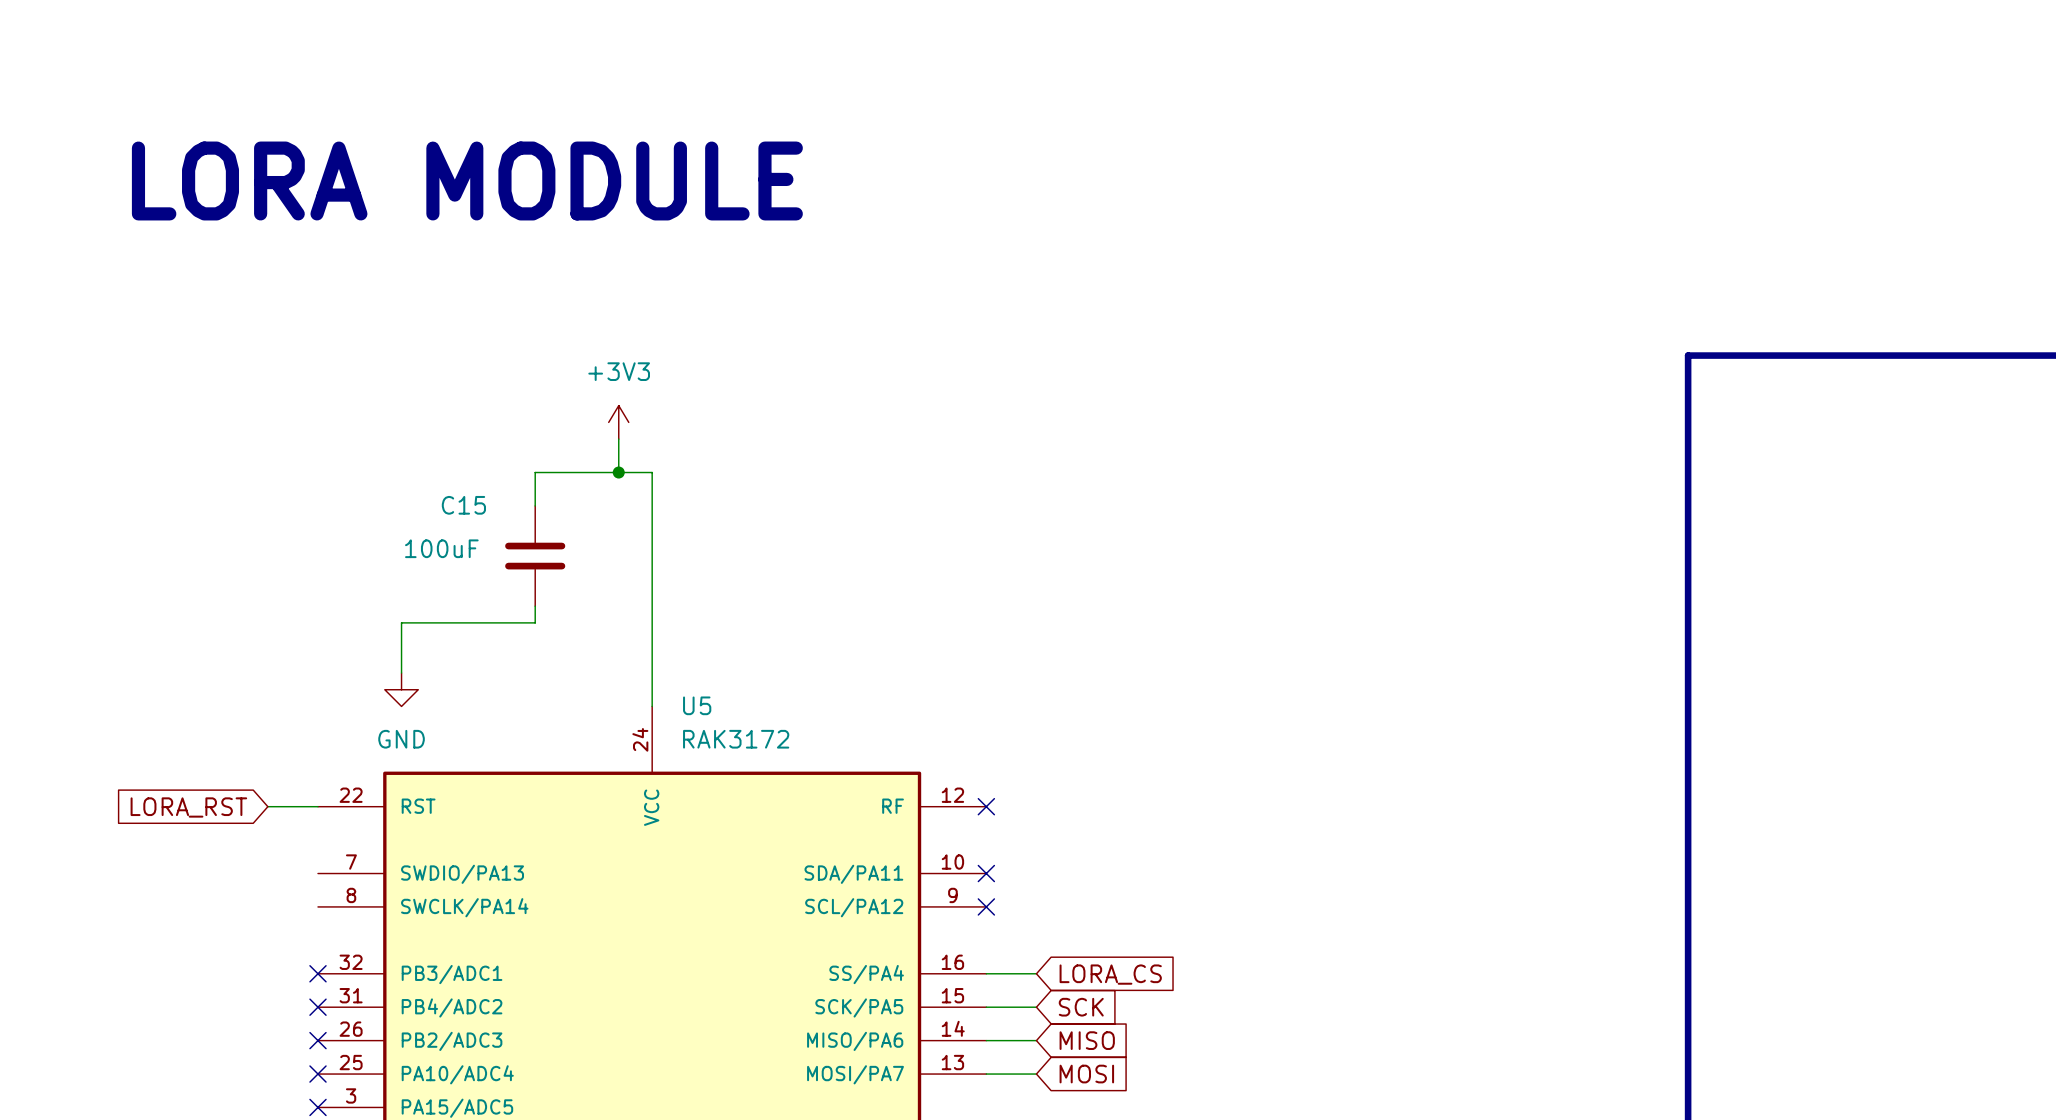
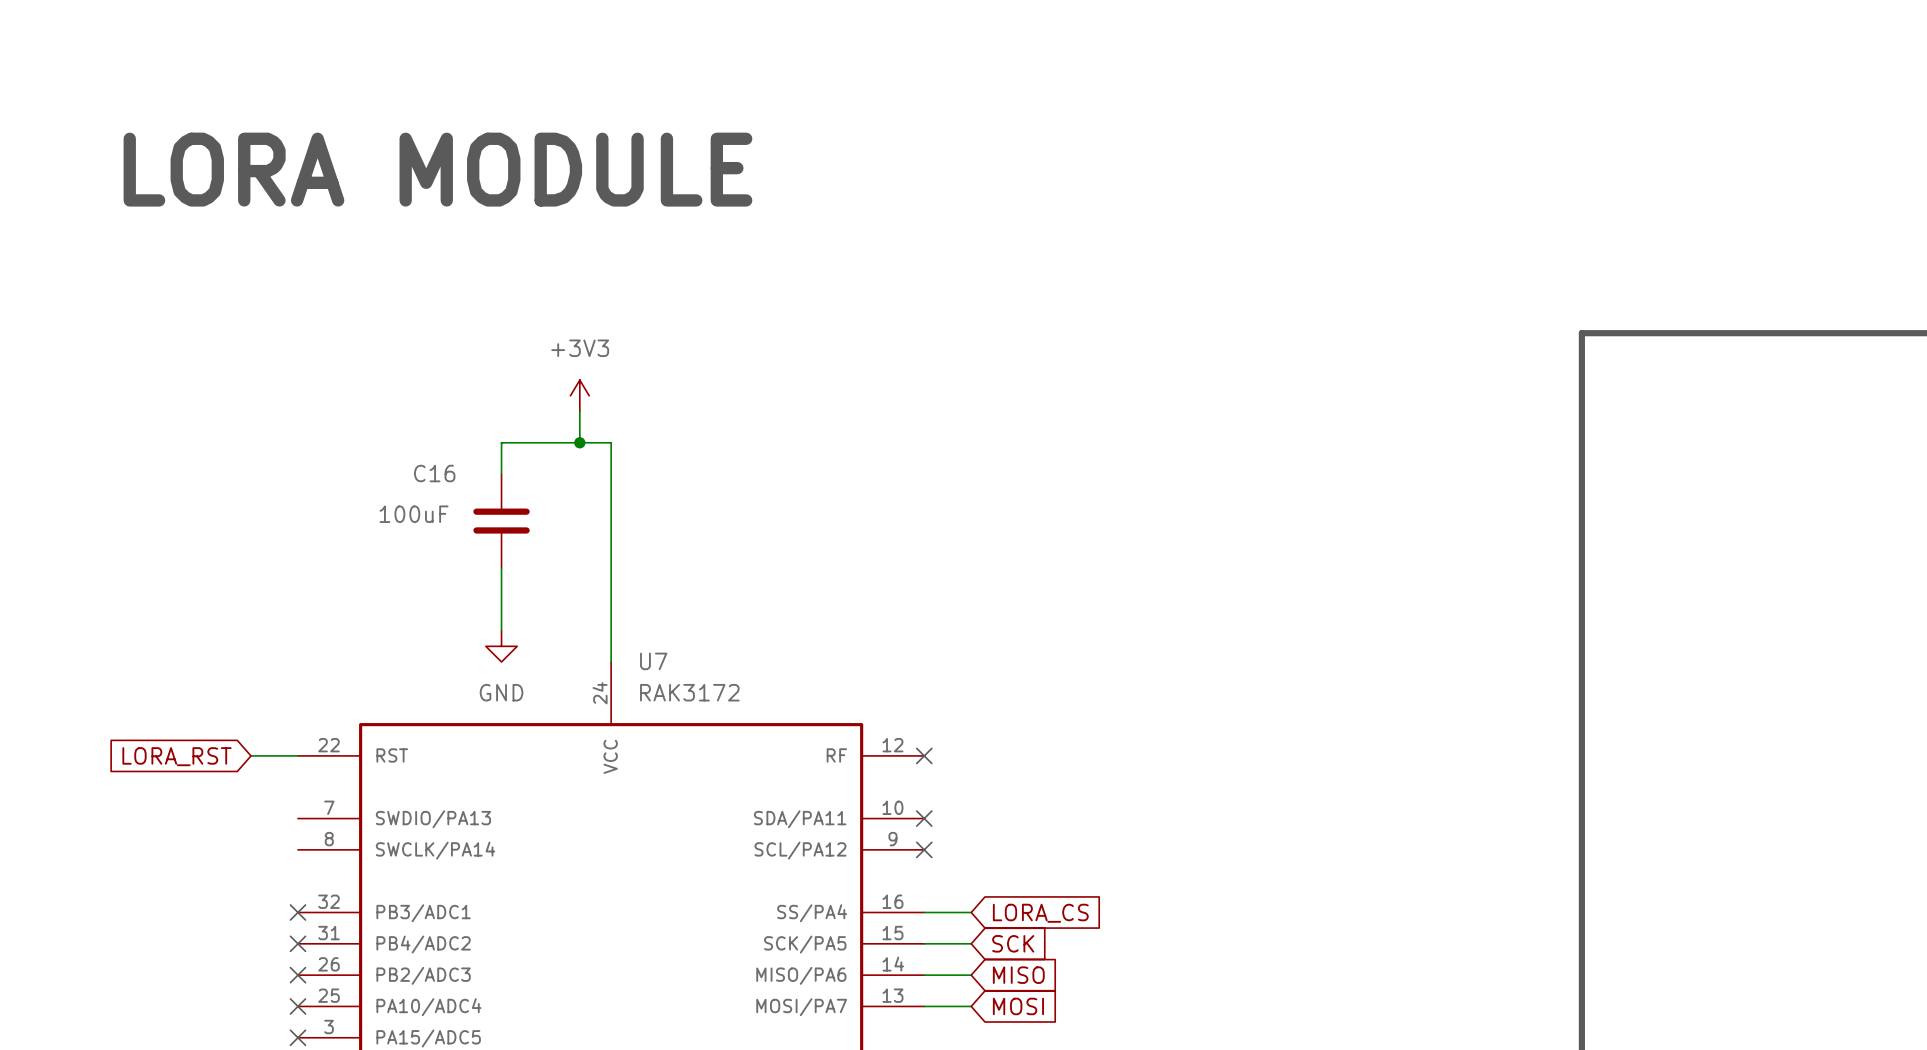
C15 name: C15 (463, 505) -> C16 (434, 473)
wire: (535, 622) (401, 622) (401, 673) -> (501, 583) (501, 630)
power symbol position: GND (401, 689) -> GND (501, 646)
U5 name: U5 (697, 705) -> U7 (653, 661)

